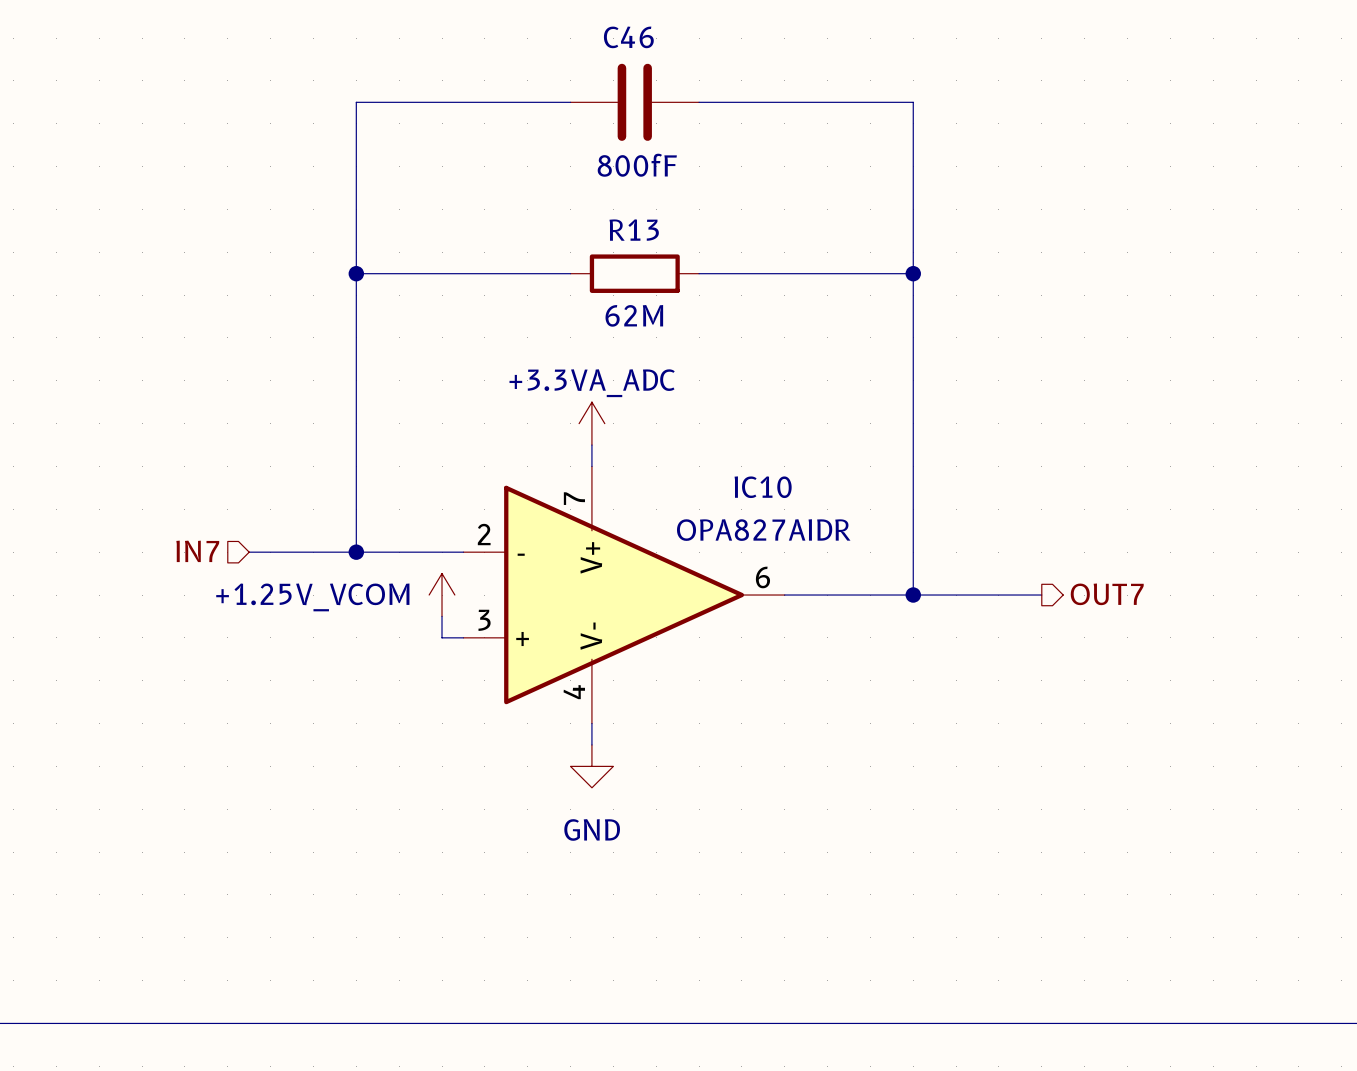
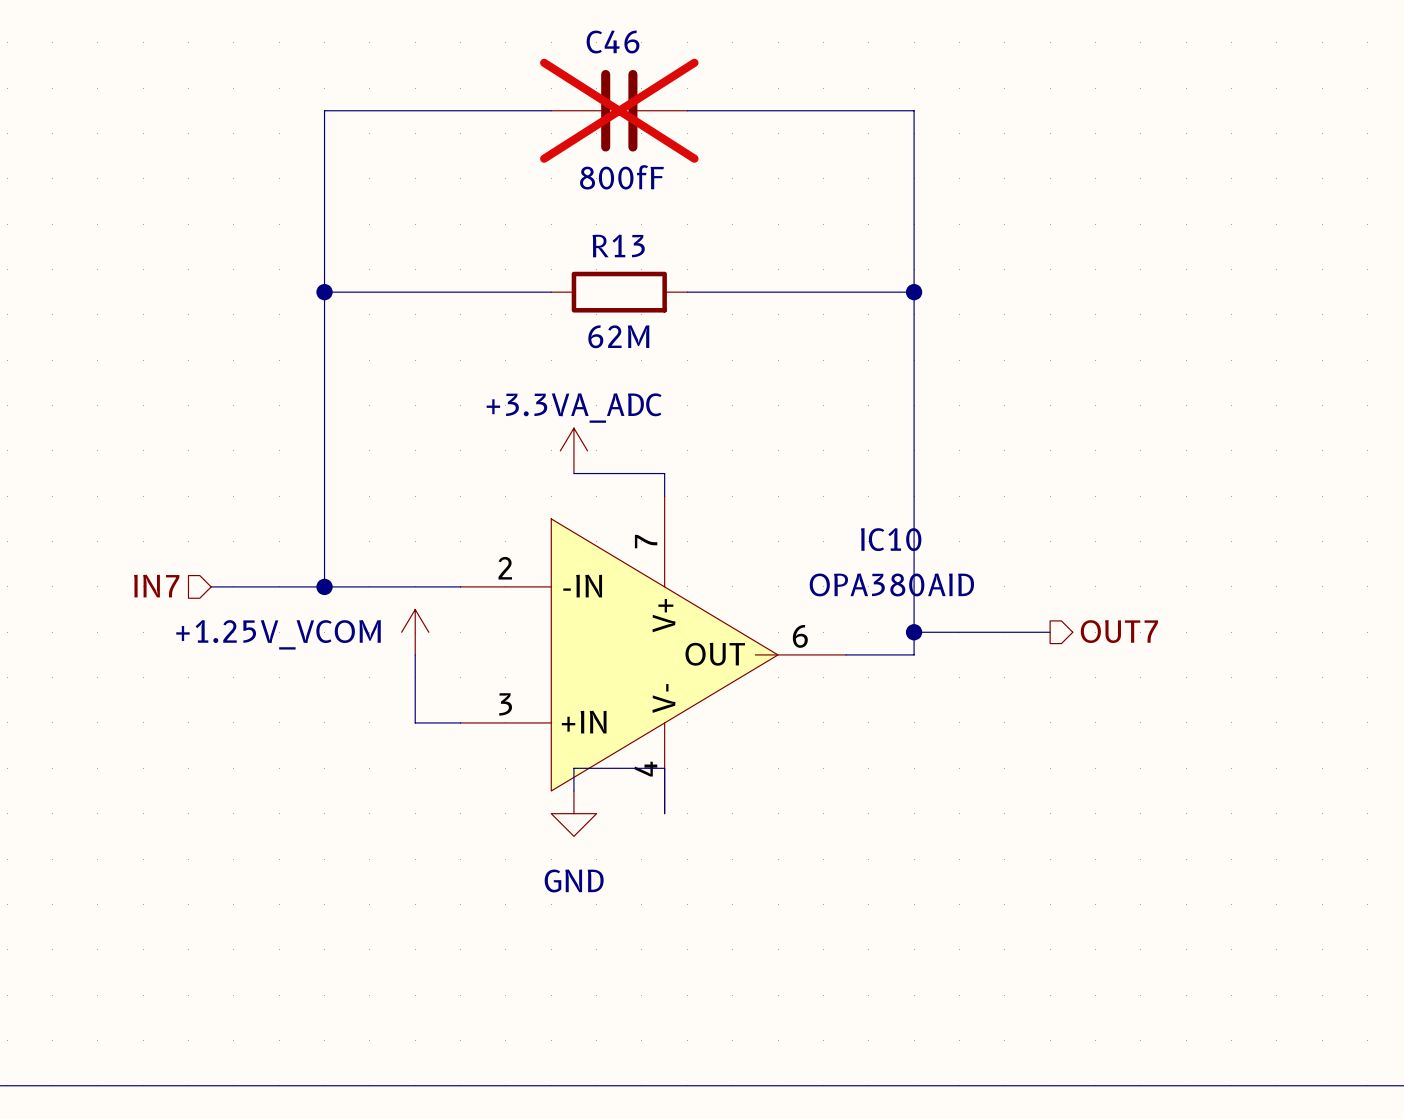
C46 do-not-place cross: none -> (619, 110)
wire: (591, 445) (591, 466) -> (573, 473) (664, 473) (664, 496)
IC10 symbol: [463, 466, 785, 724] -> [460, 496, 847, 814]
IC10 name position: IC10 (763, 487) -> IC10 (891, 539)
IC10 value: OPA827AIDR (763, 530) -> OPA380AID (891, 584)
wire: (784, 595) (913, 595) -> (846, 654) (914, 654) (914, 632)
wire: (442, 637) (463, 637) -> (415, 677) (415, 722) (460, 722)
wire: none -> (573, 768) (664, 768) (664, 813)

